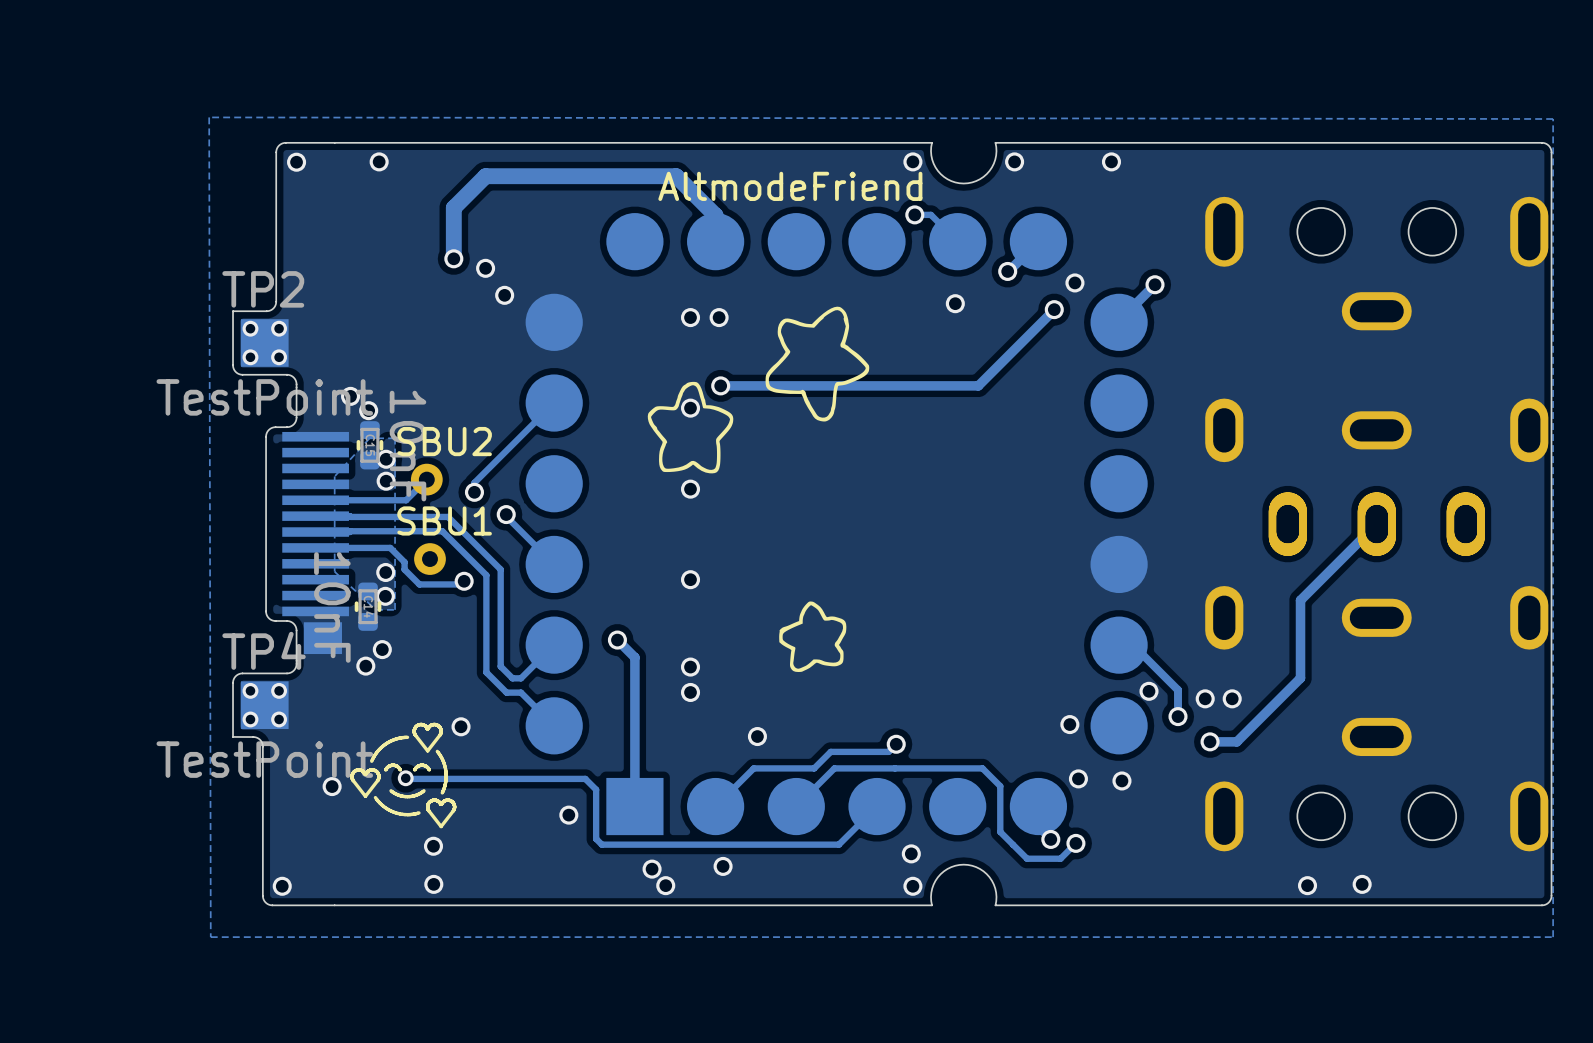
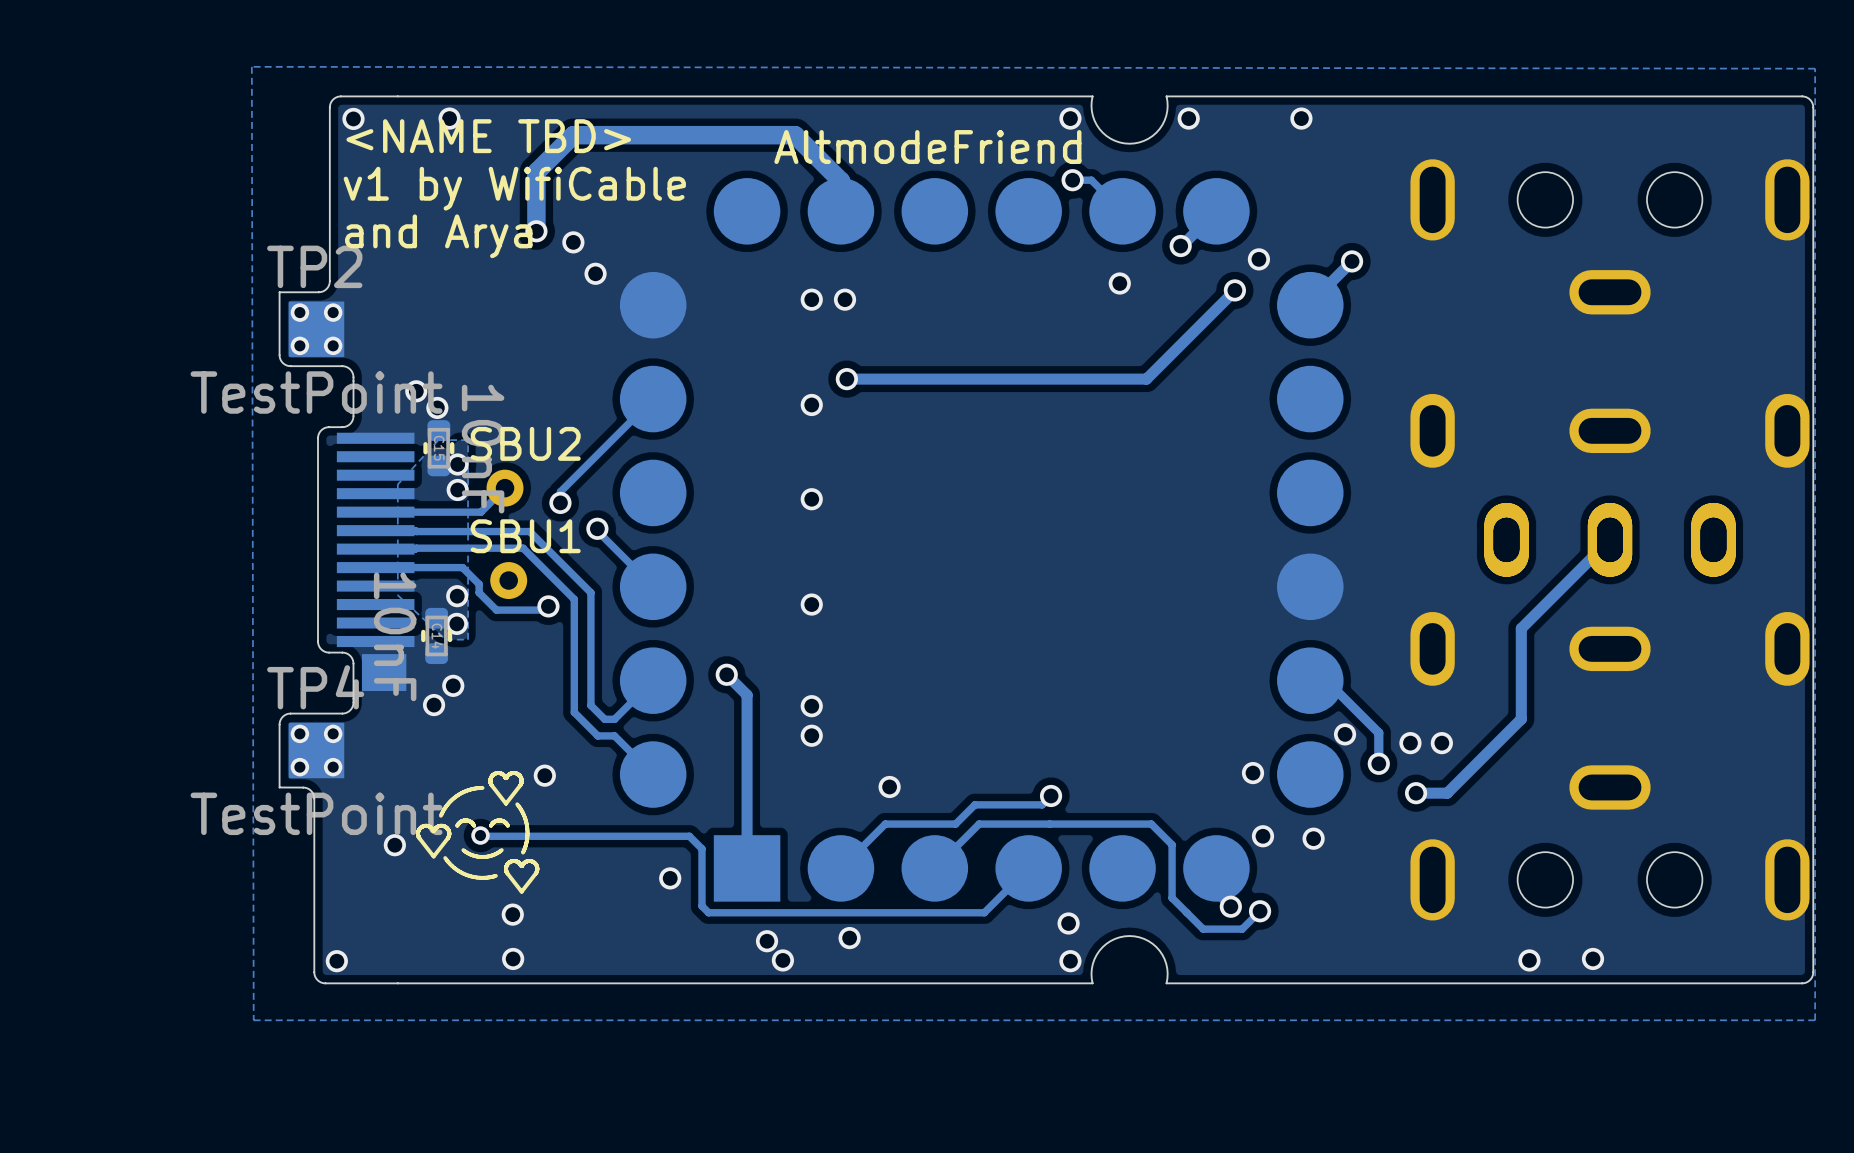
text: none -> <NAME TBD> (488, 136)
text: none -> v1 by WifiCable (514, 188)
text: none -> and Arya (438, 236)
drawing: [647, 306, 870, 673] -> none

